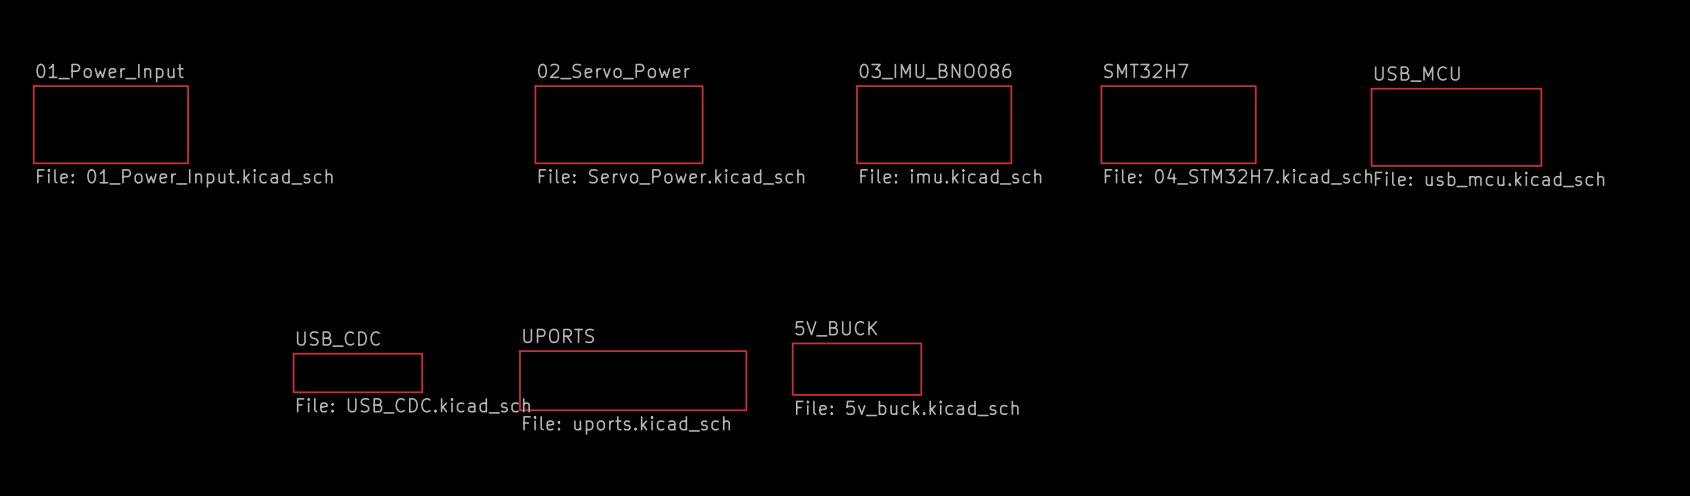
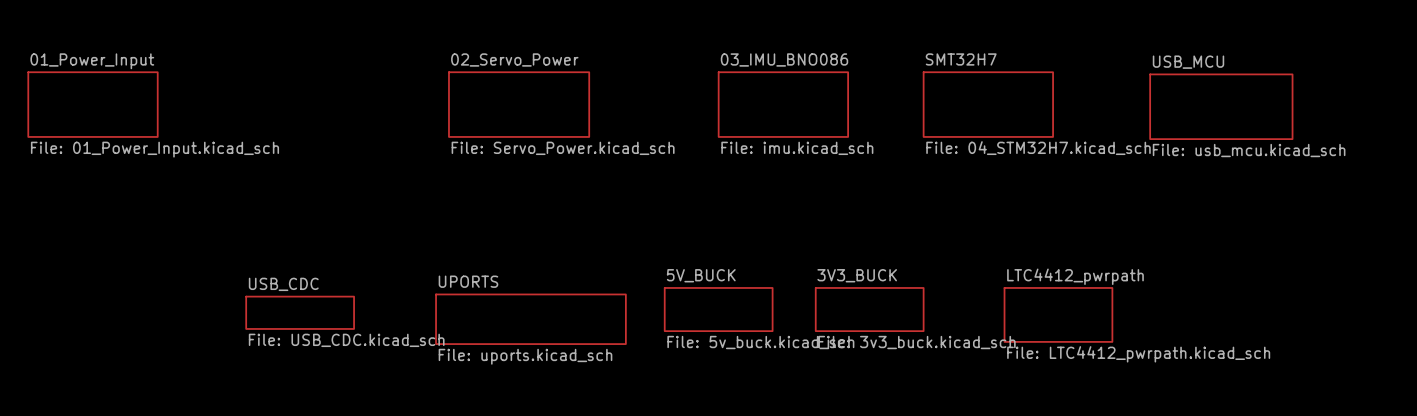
sheet 3V3_BUCK: none -> File: 3v3_buck.kicad_sch (869, 309)
sheet LTC4412_pwrpath: none -> File: LTC4412_pwrpath.kicad_sch (1058, 314)

